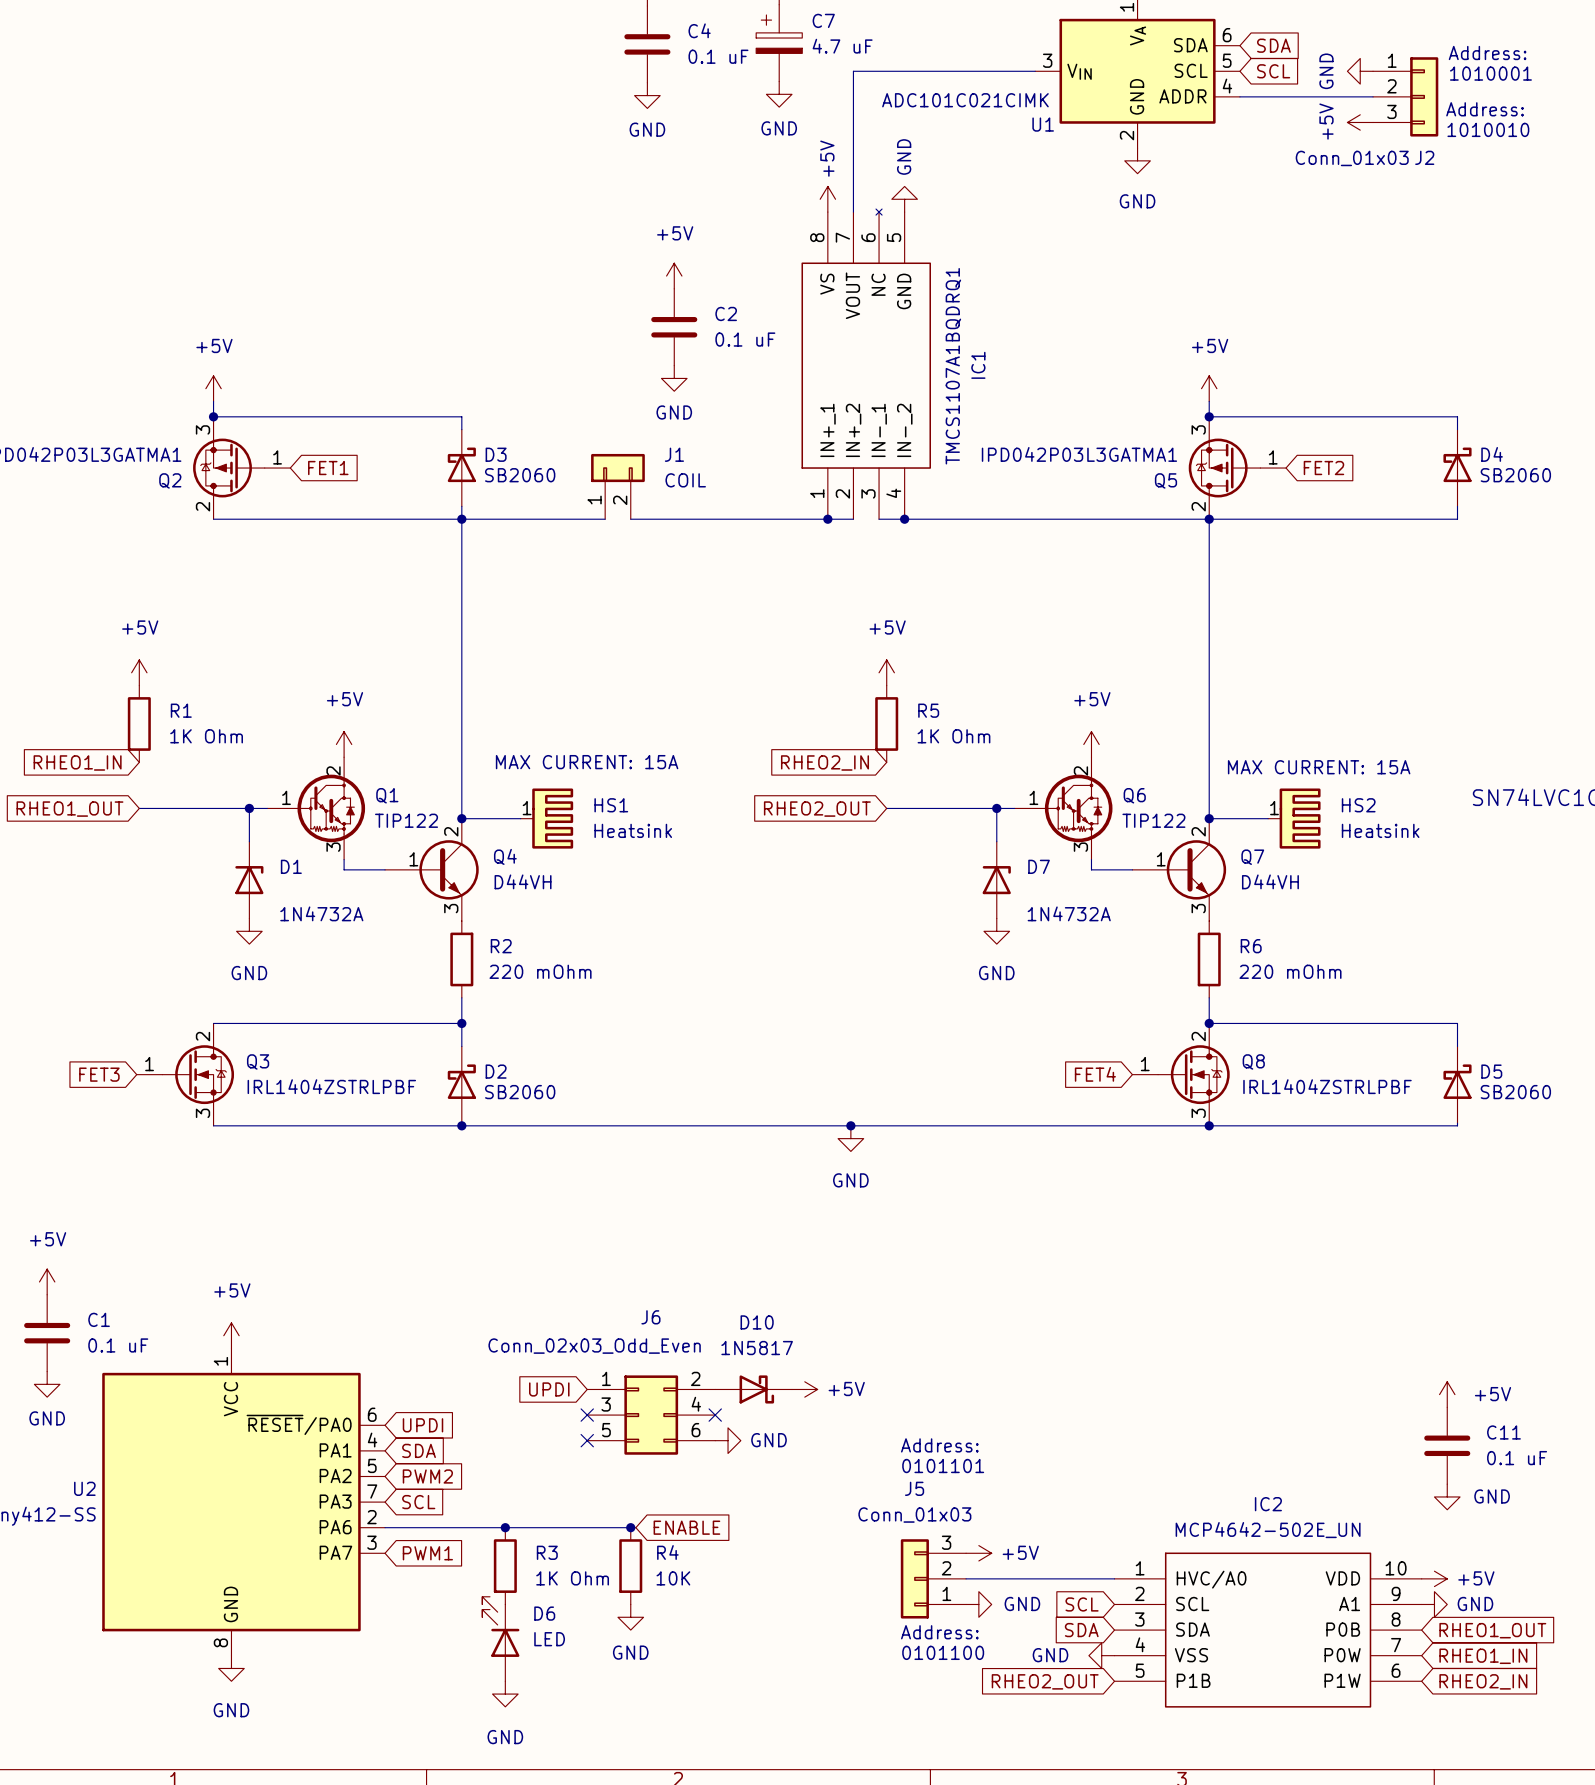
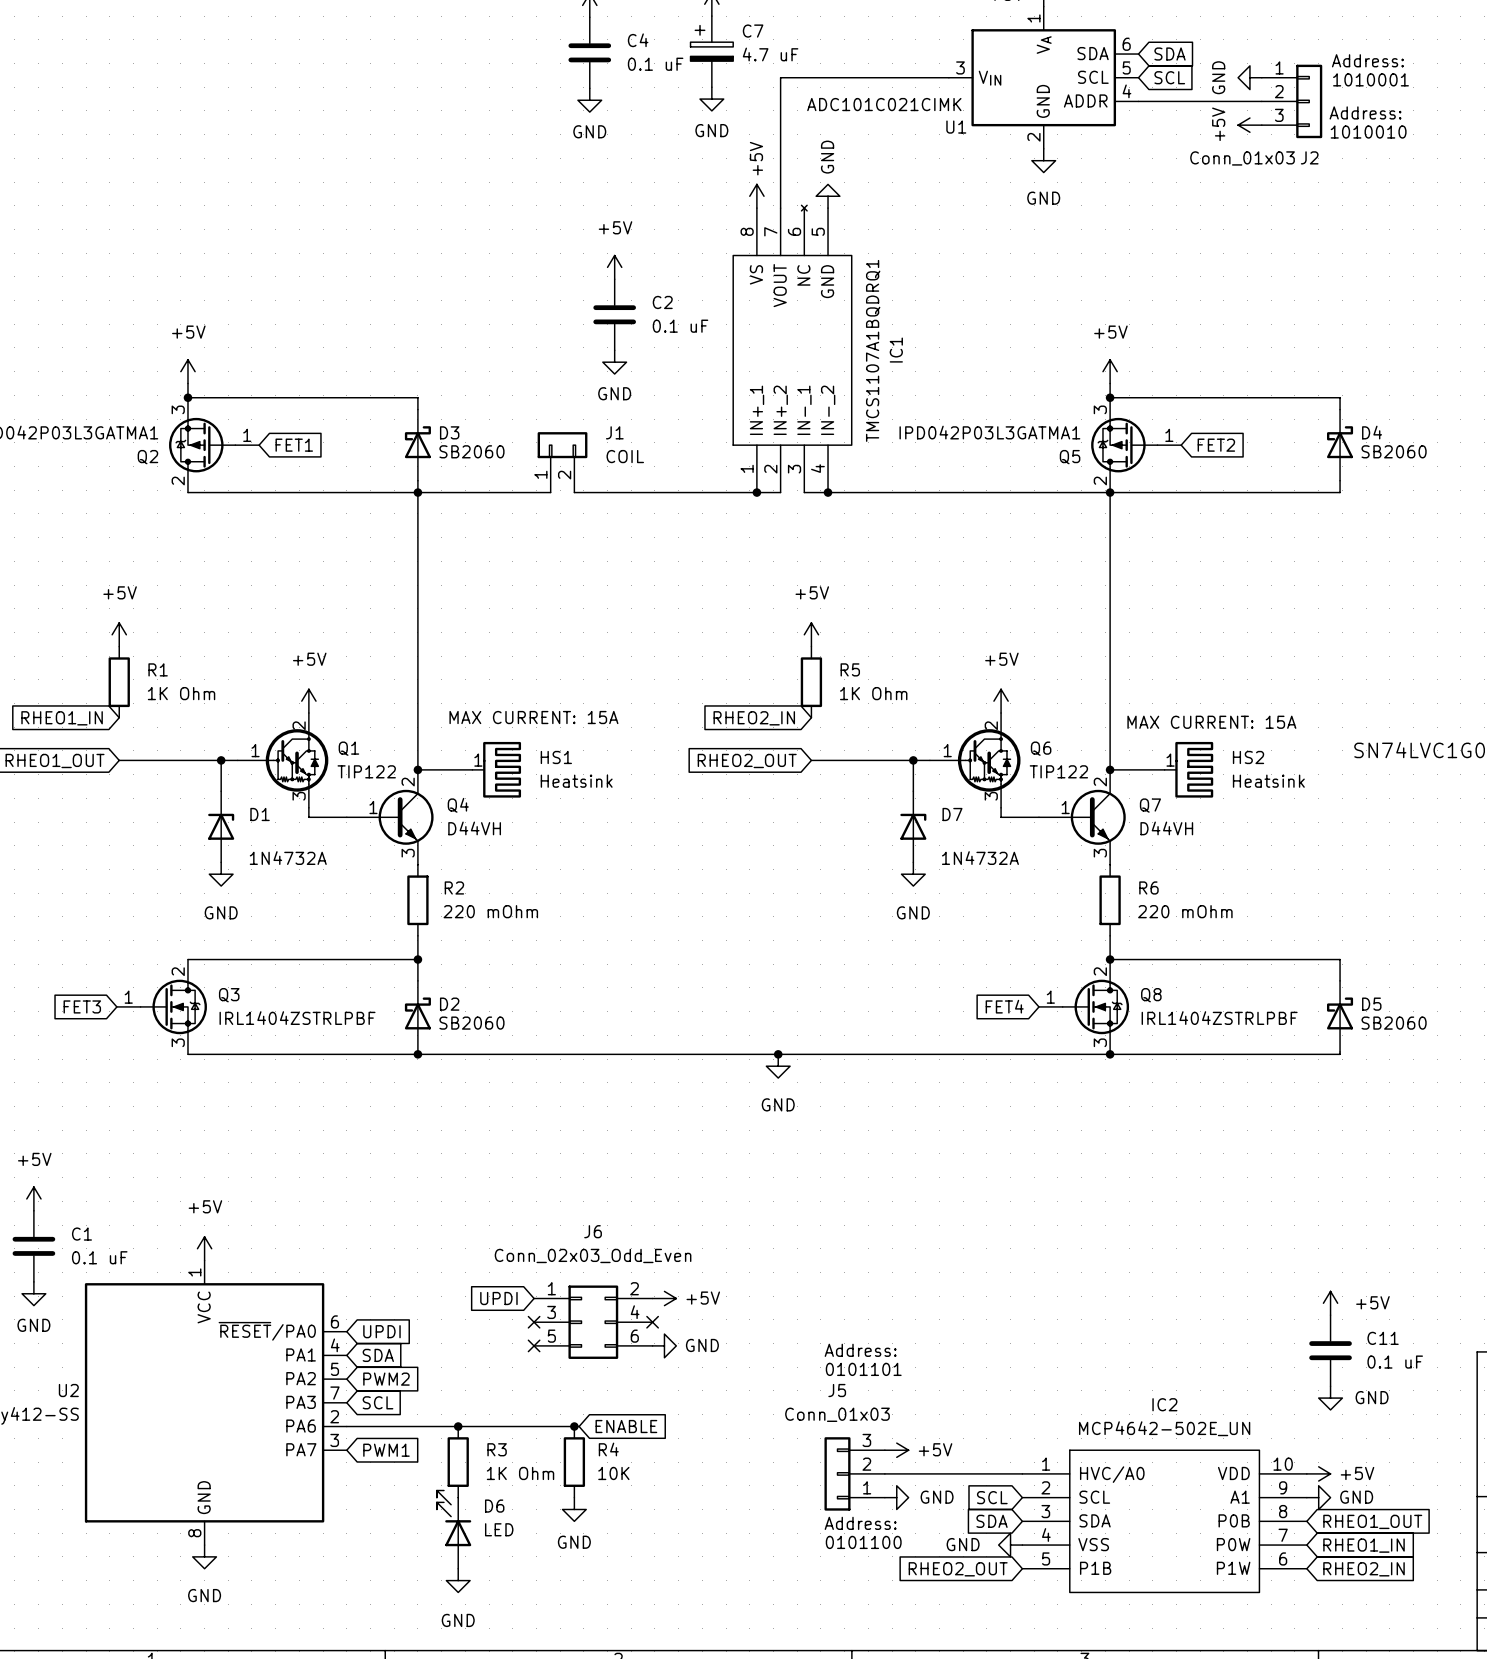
J6 value position: Conn_02x03_Odd_Even (594, 1346) -> Conn_02x03_Odd_Even (593, 1255)
D10: 1N5817 (753, 1389) -> none
power symbol position: +5V (804, 1389) -> +5V (664, 1298)

